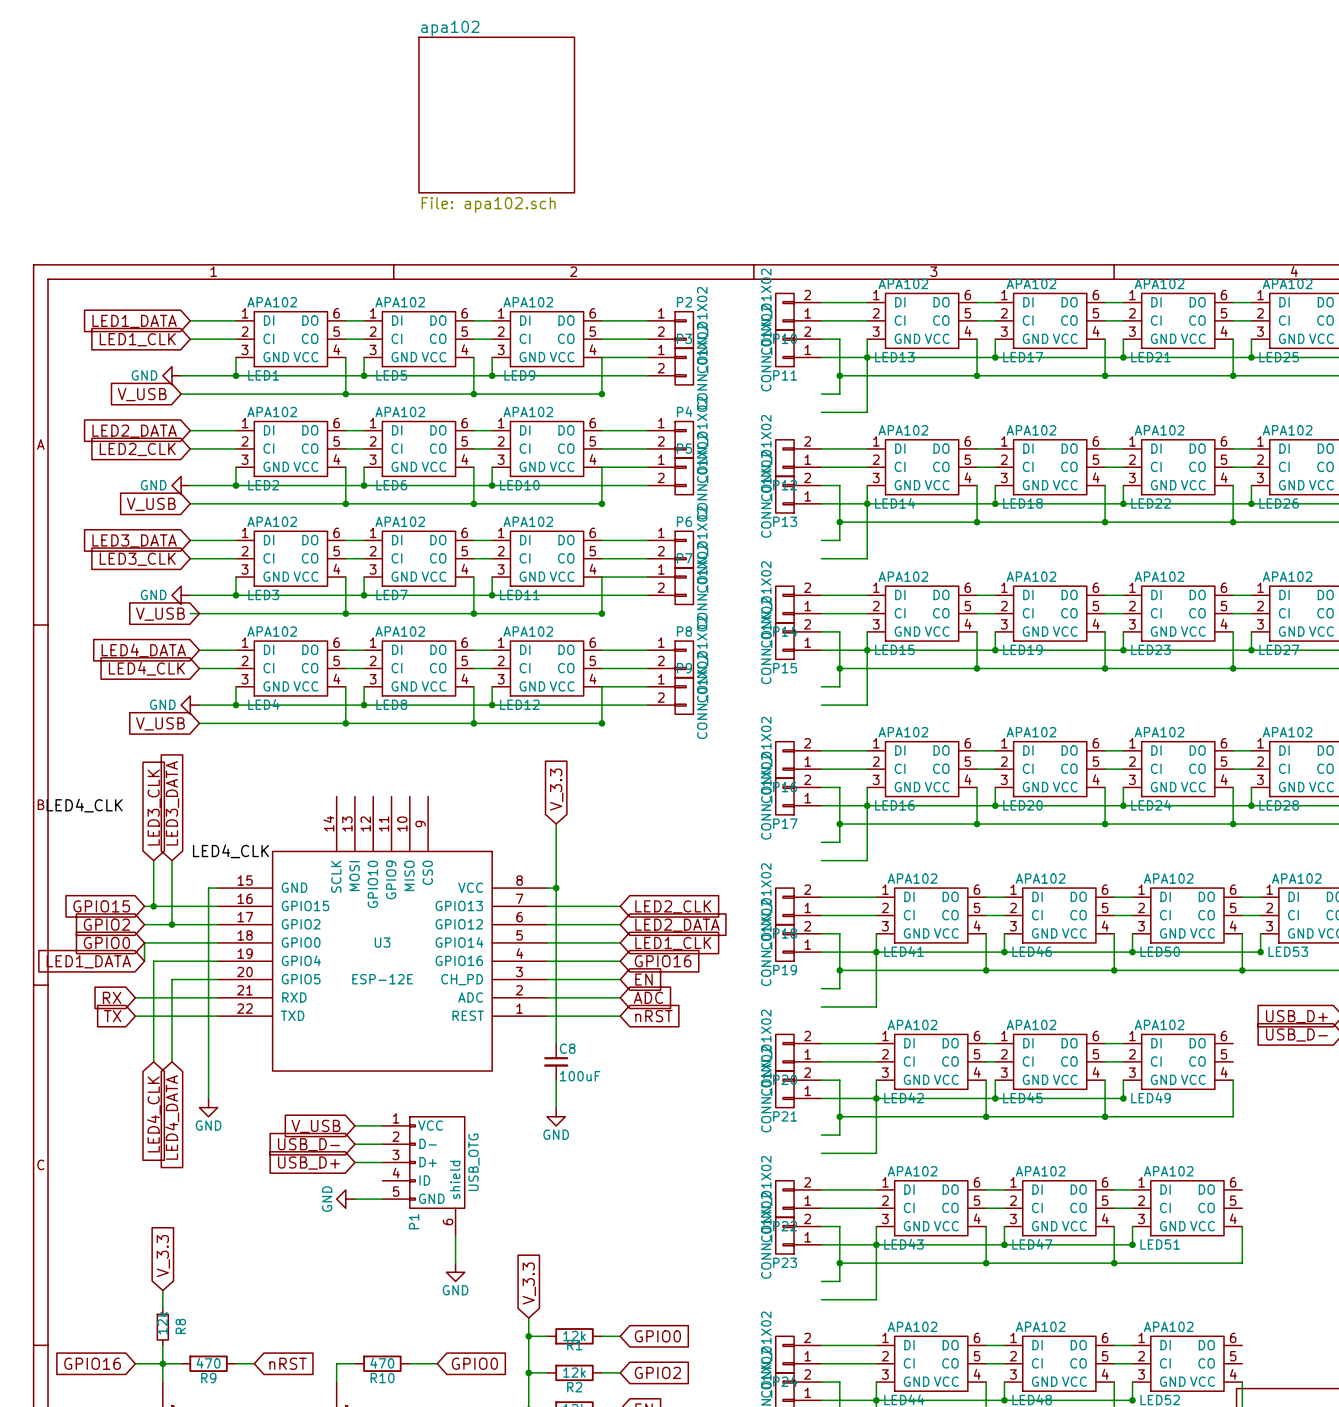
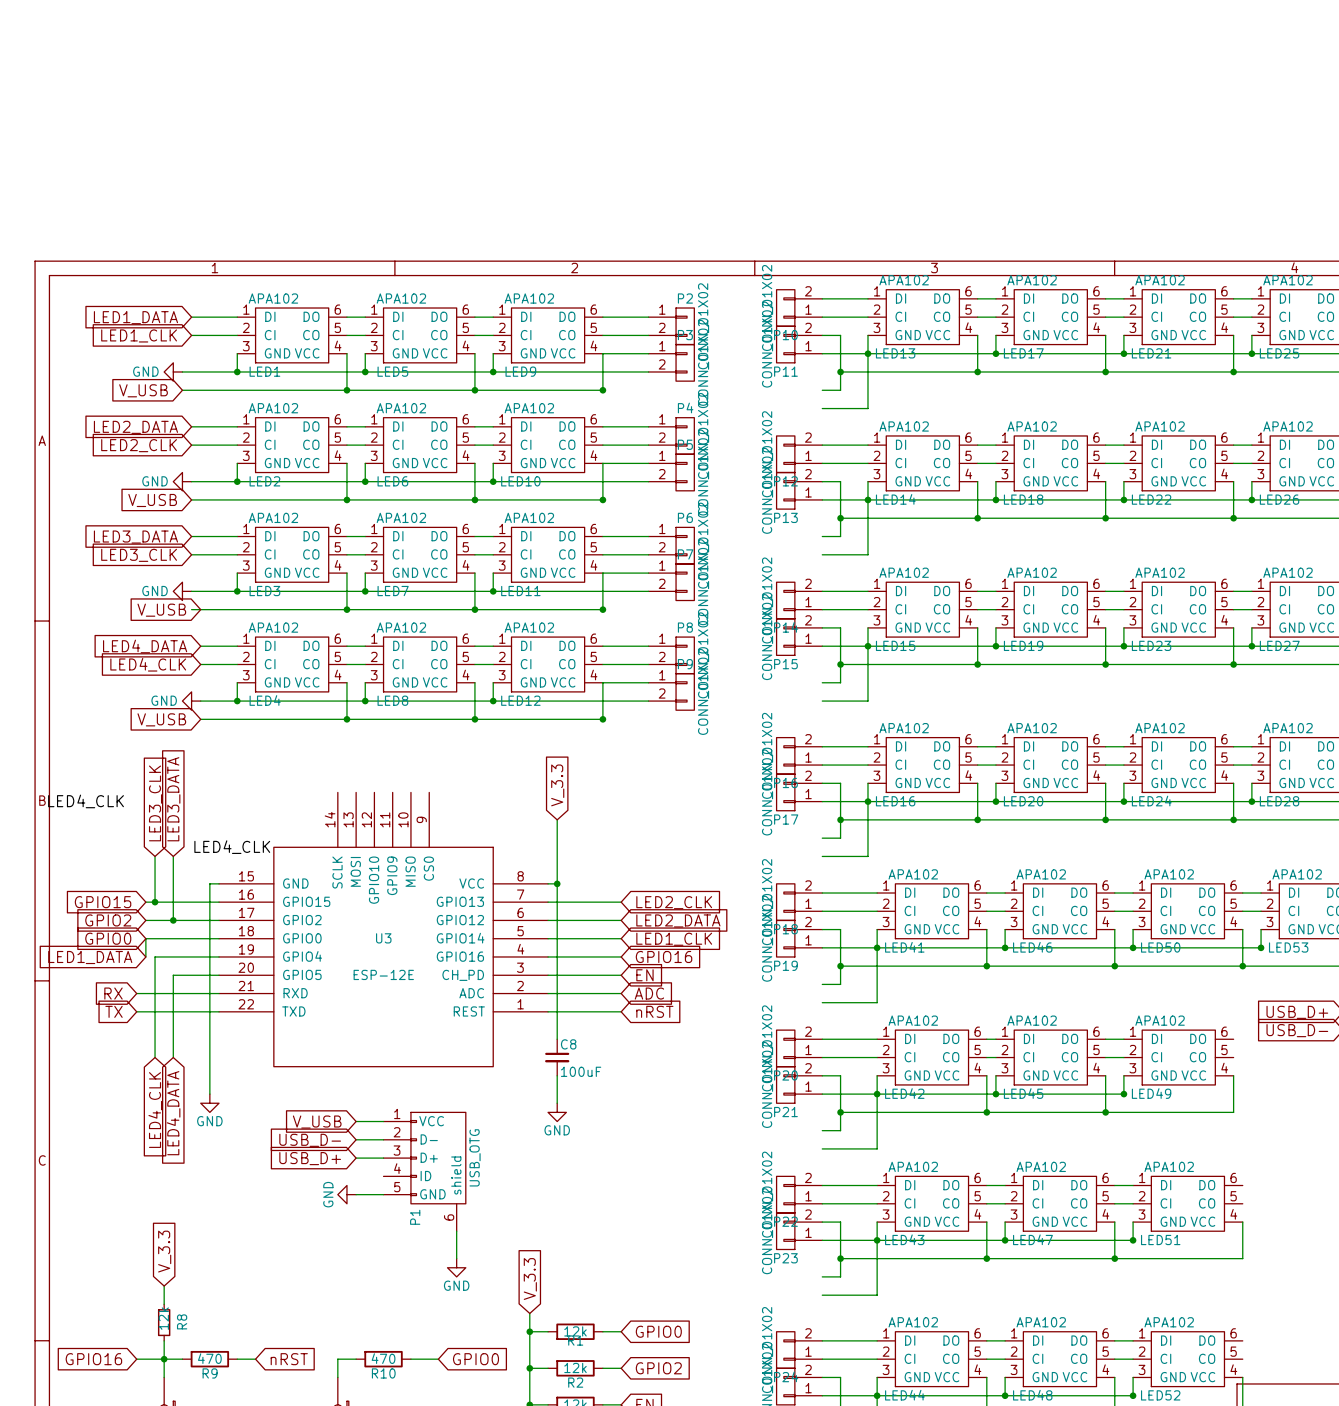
sheet apa102: File: apa102.sch (496, 115) -> none

